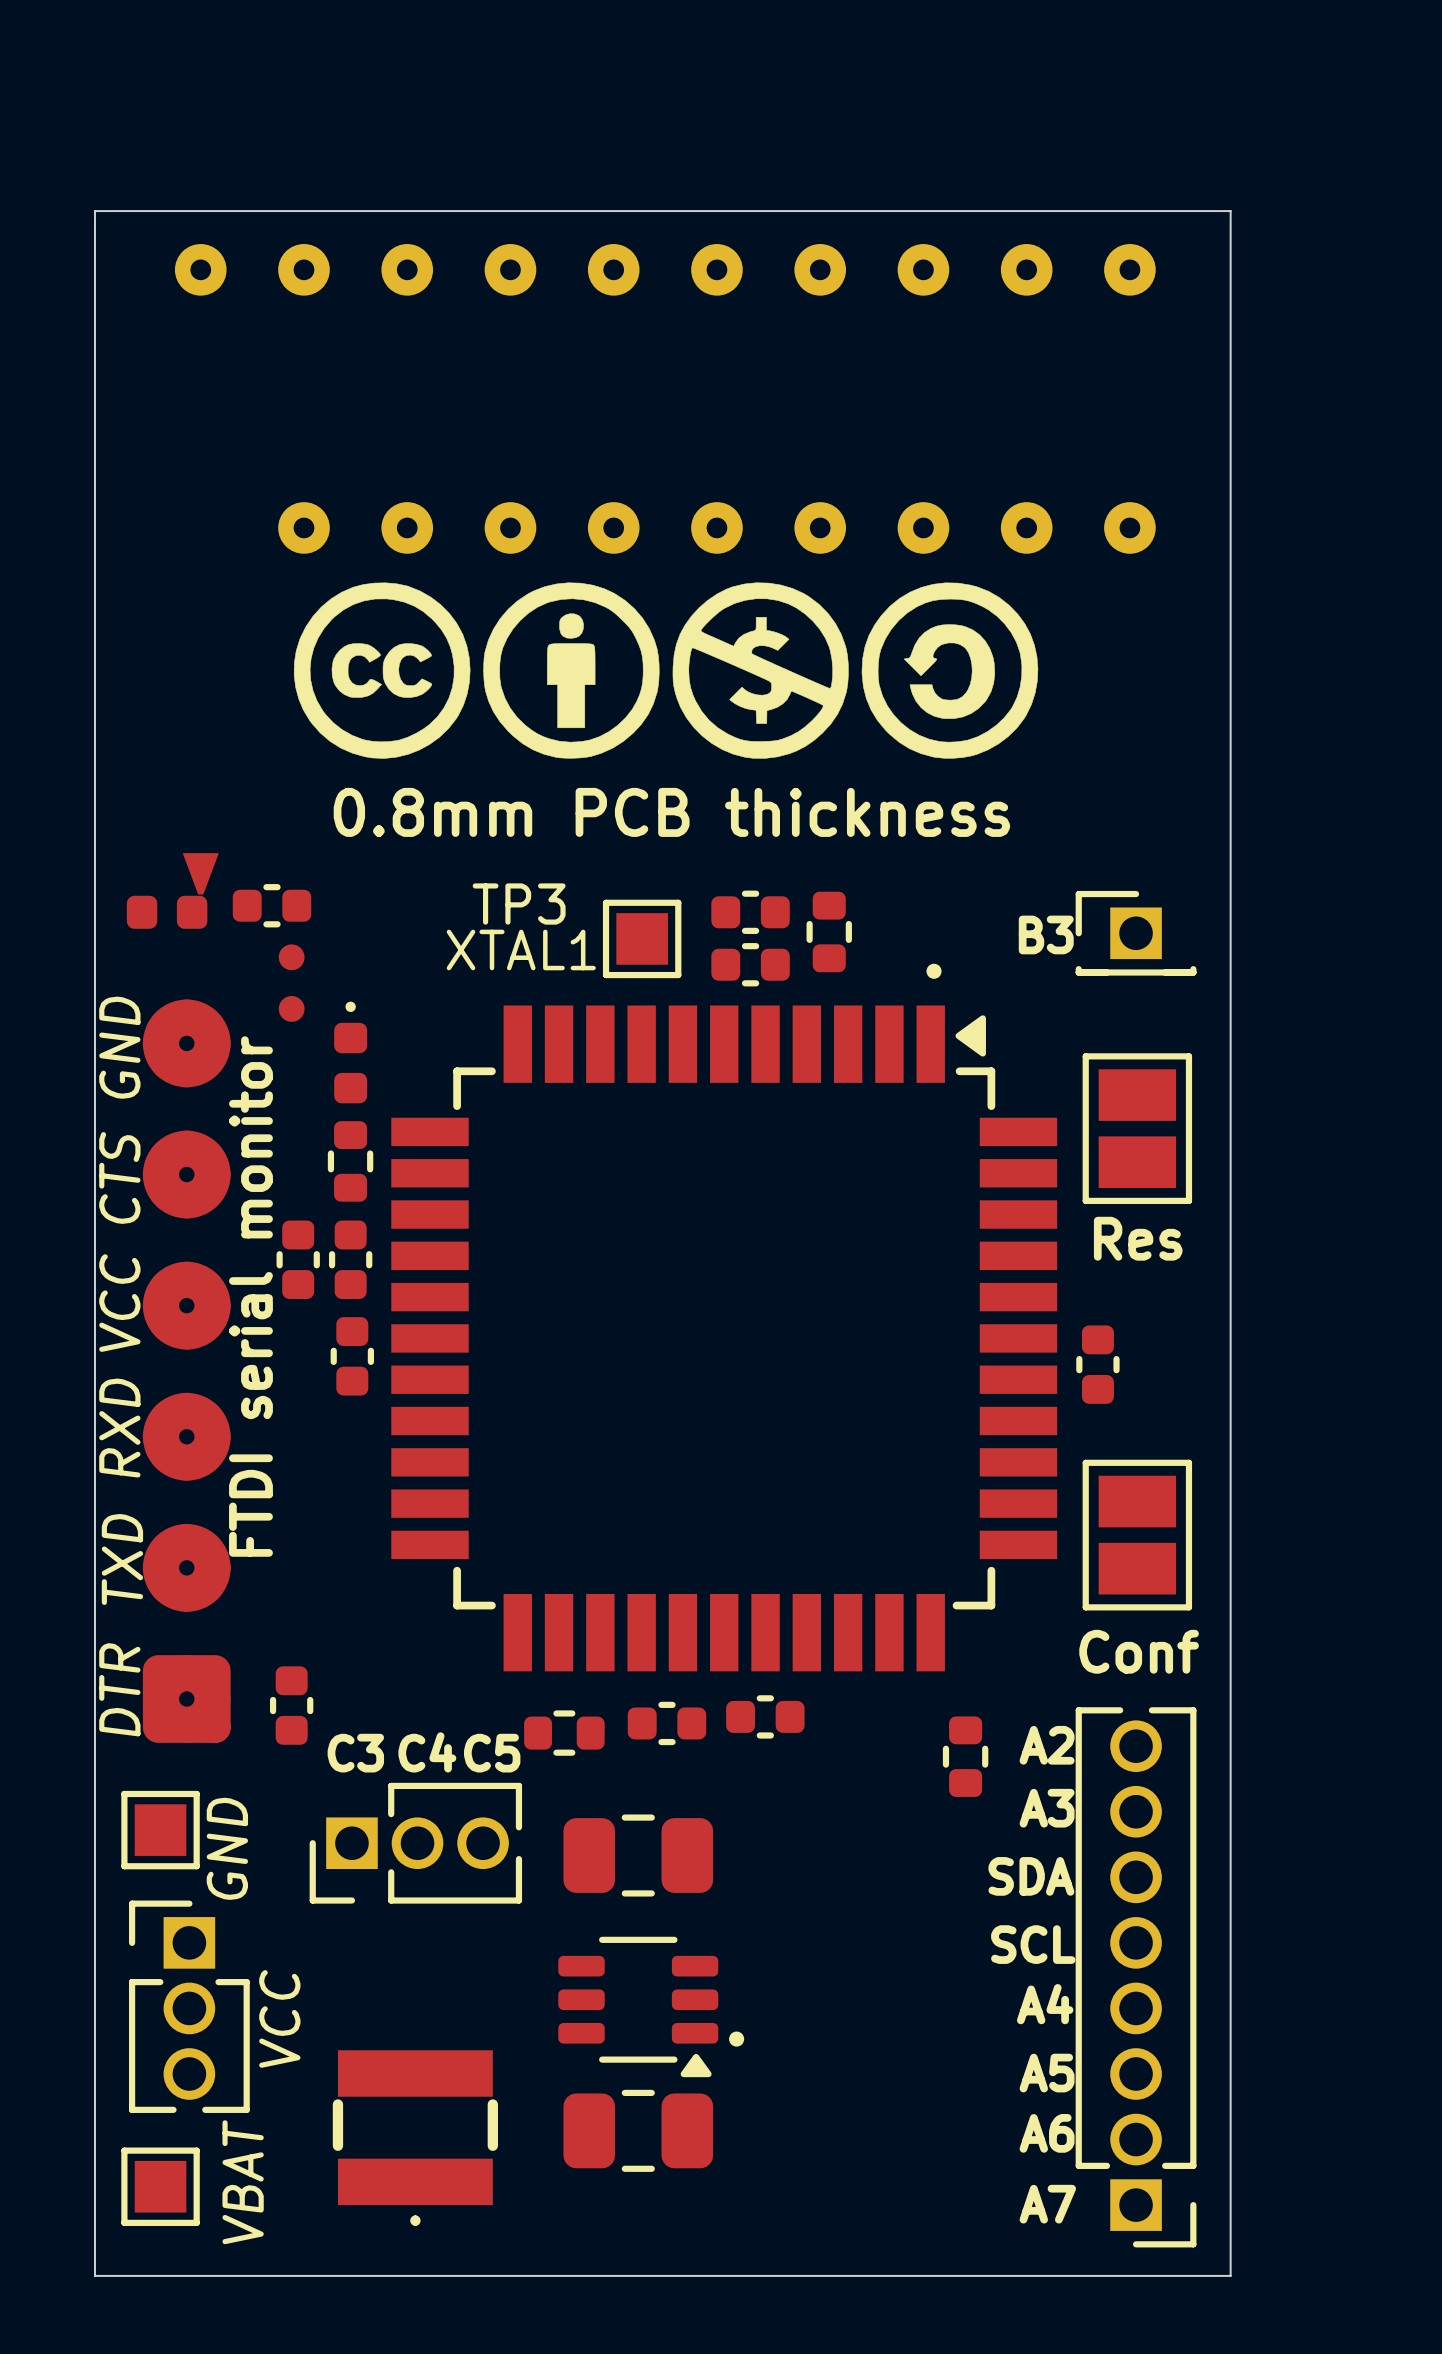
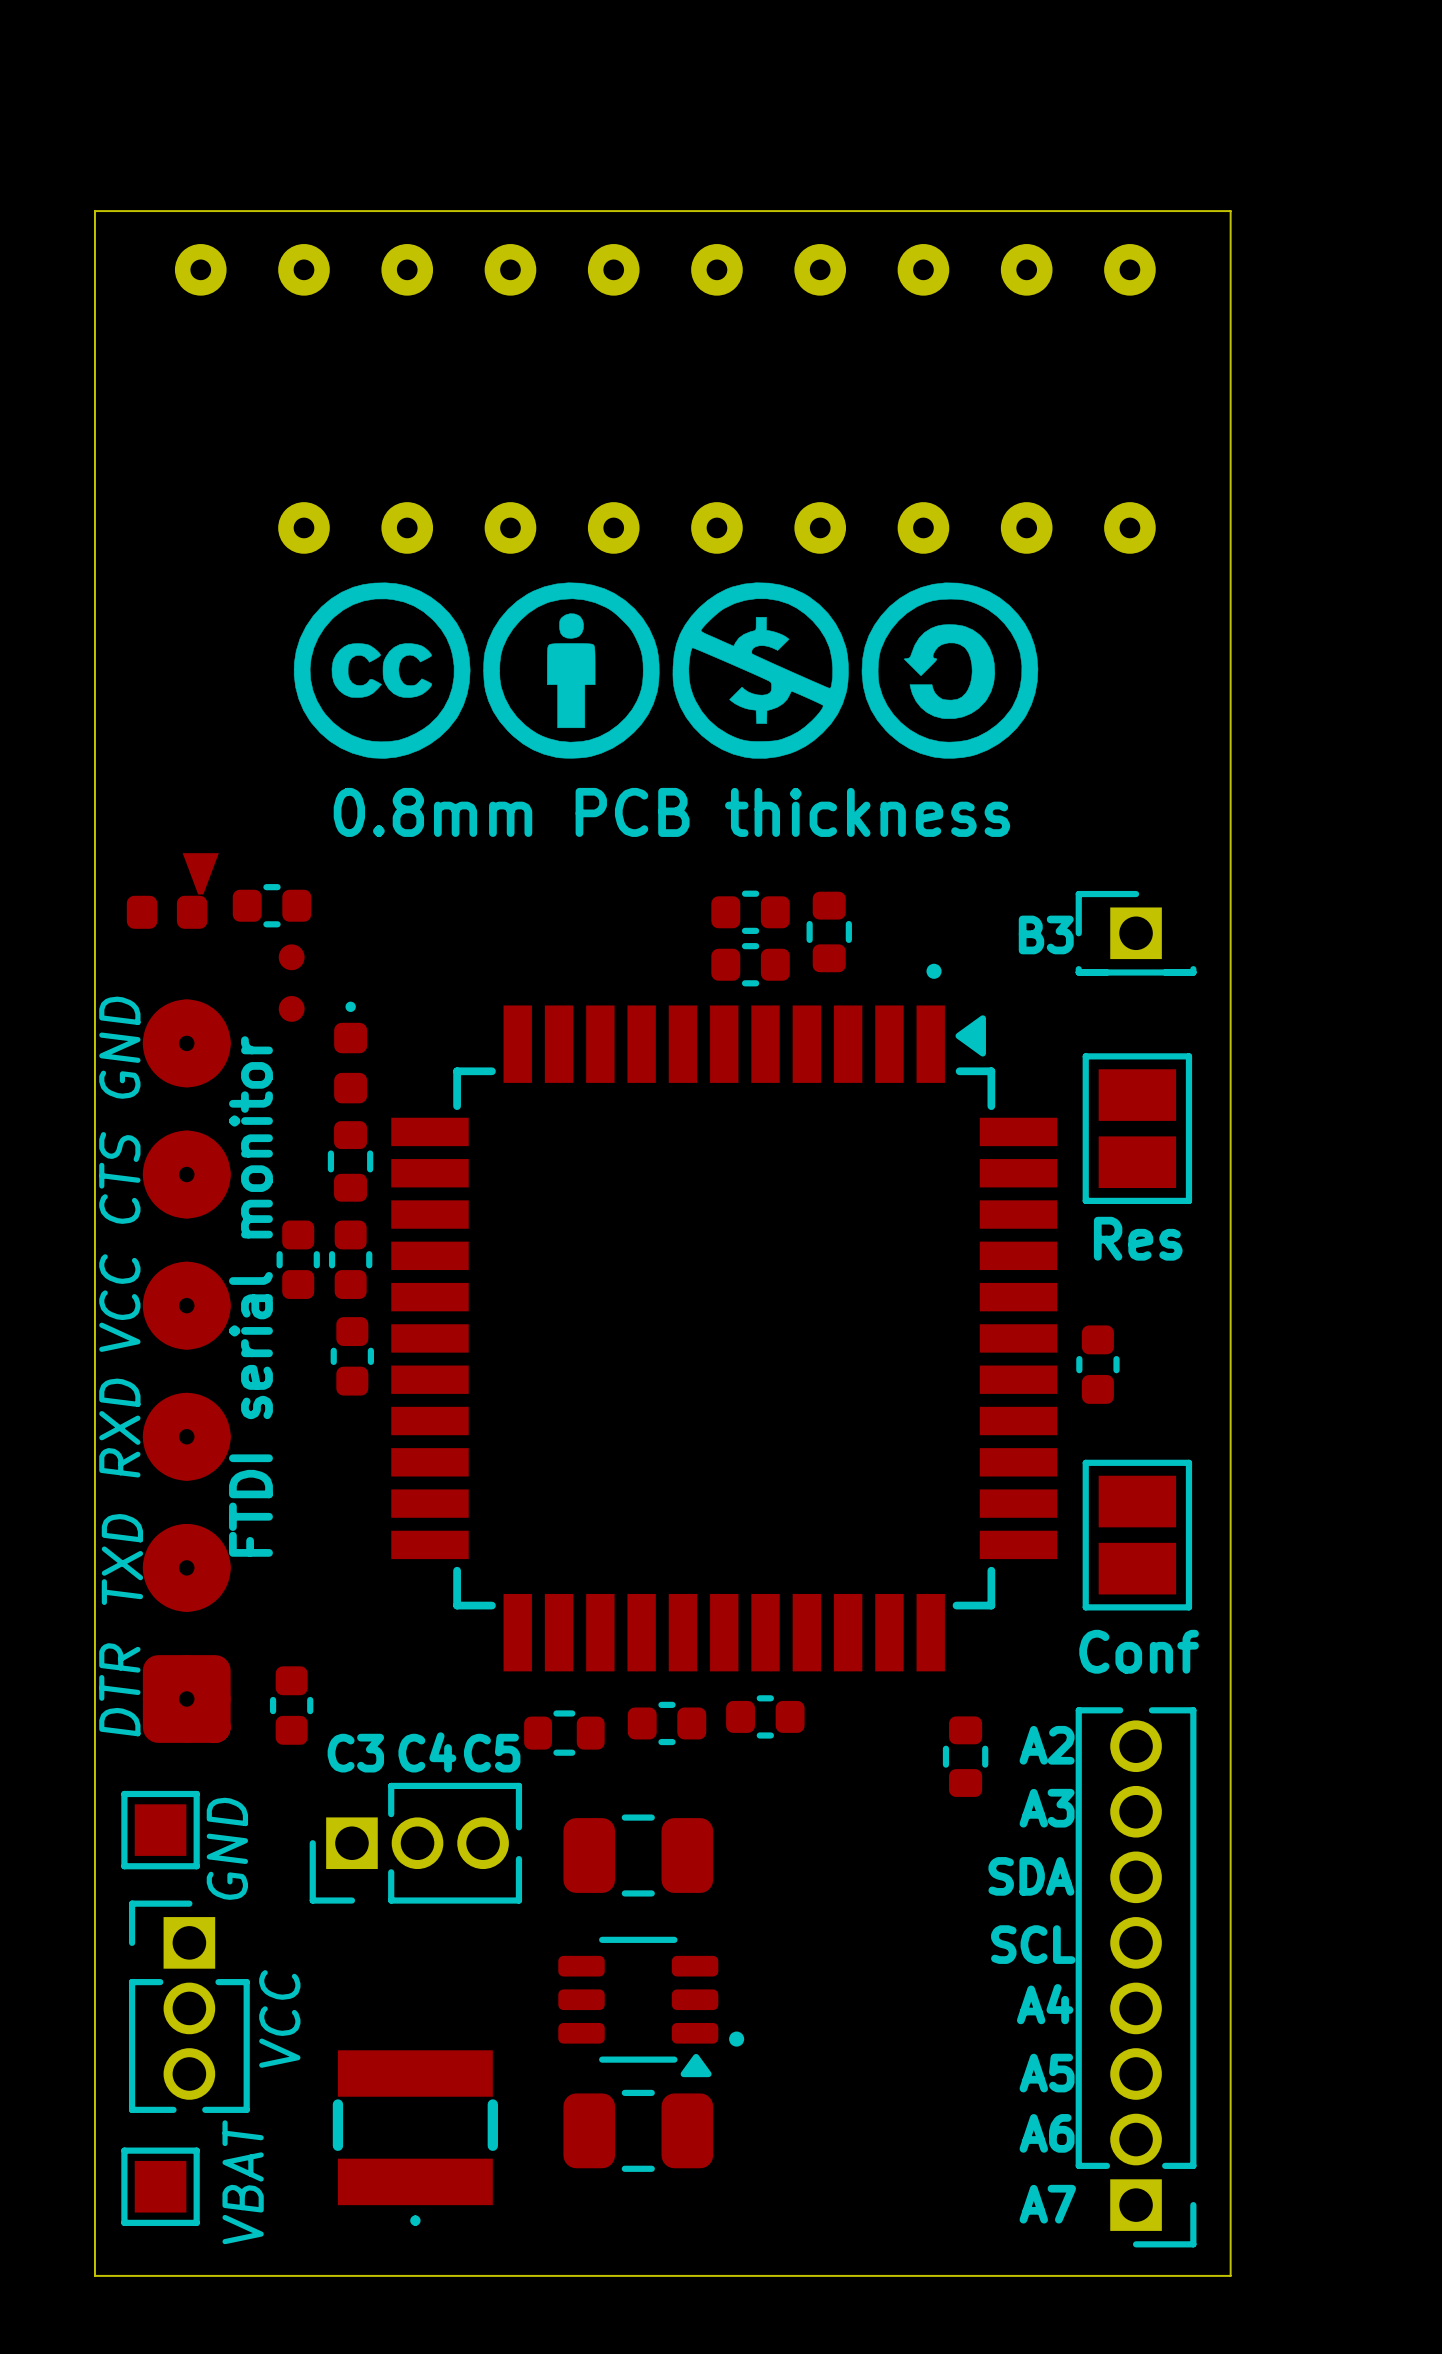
TP3: (642, 938) -> none
text: XTAL1 (521, 949) -> none

